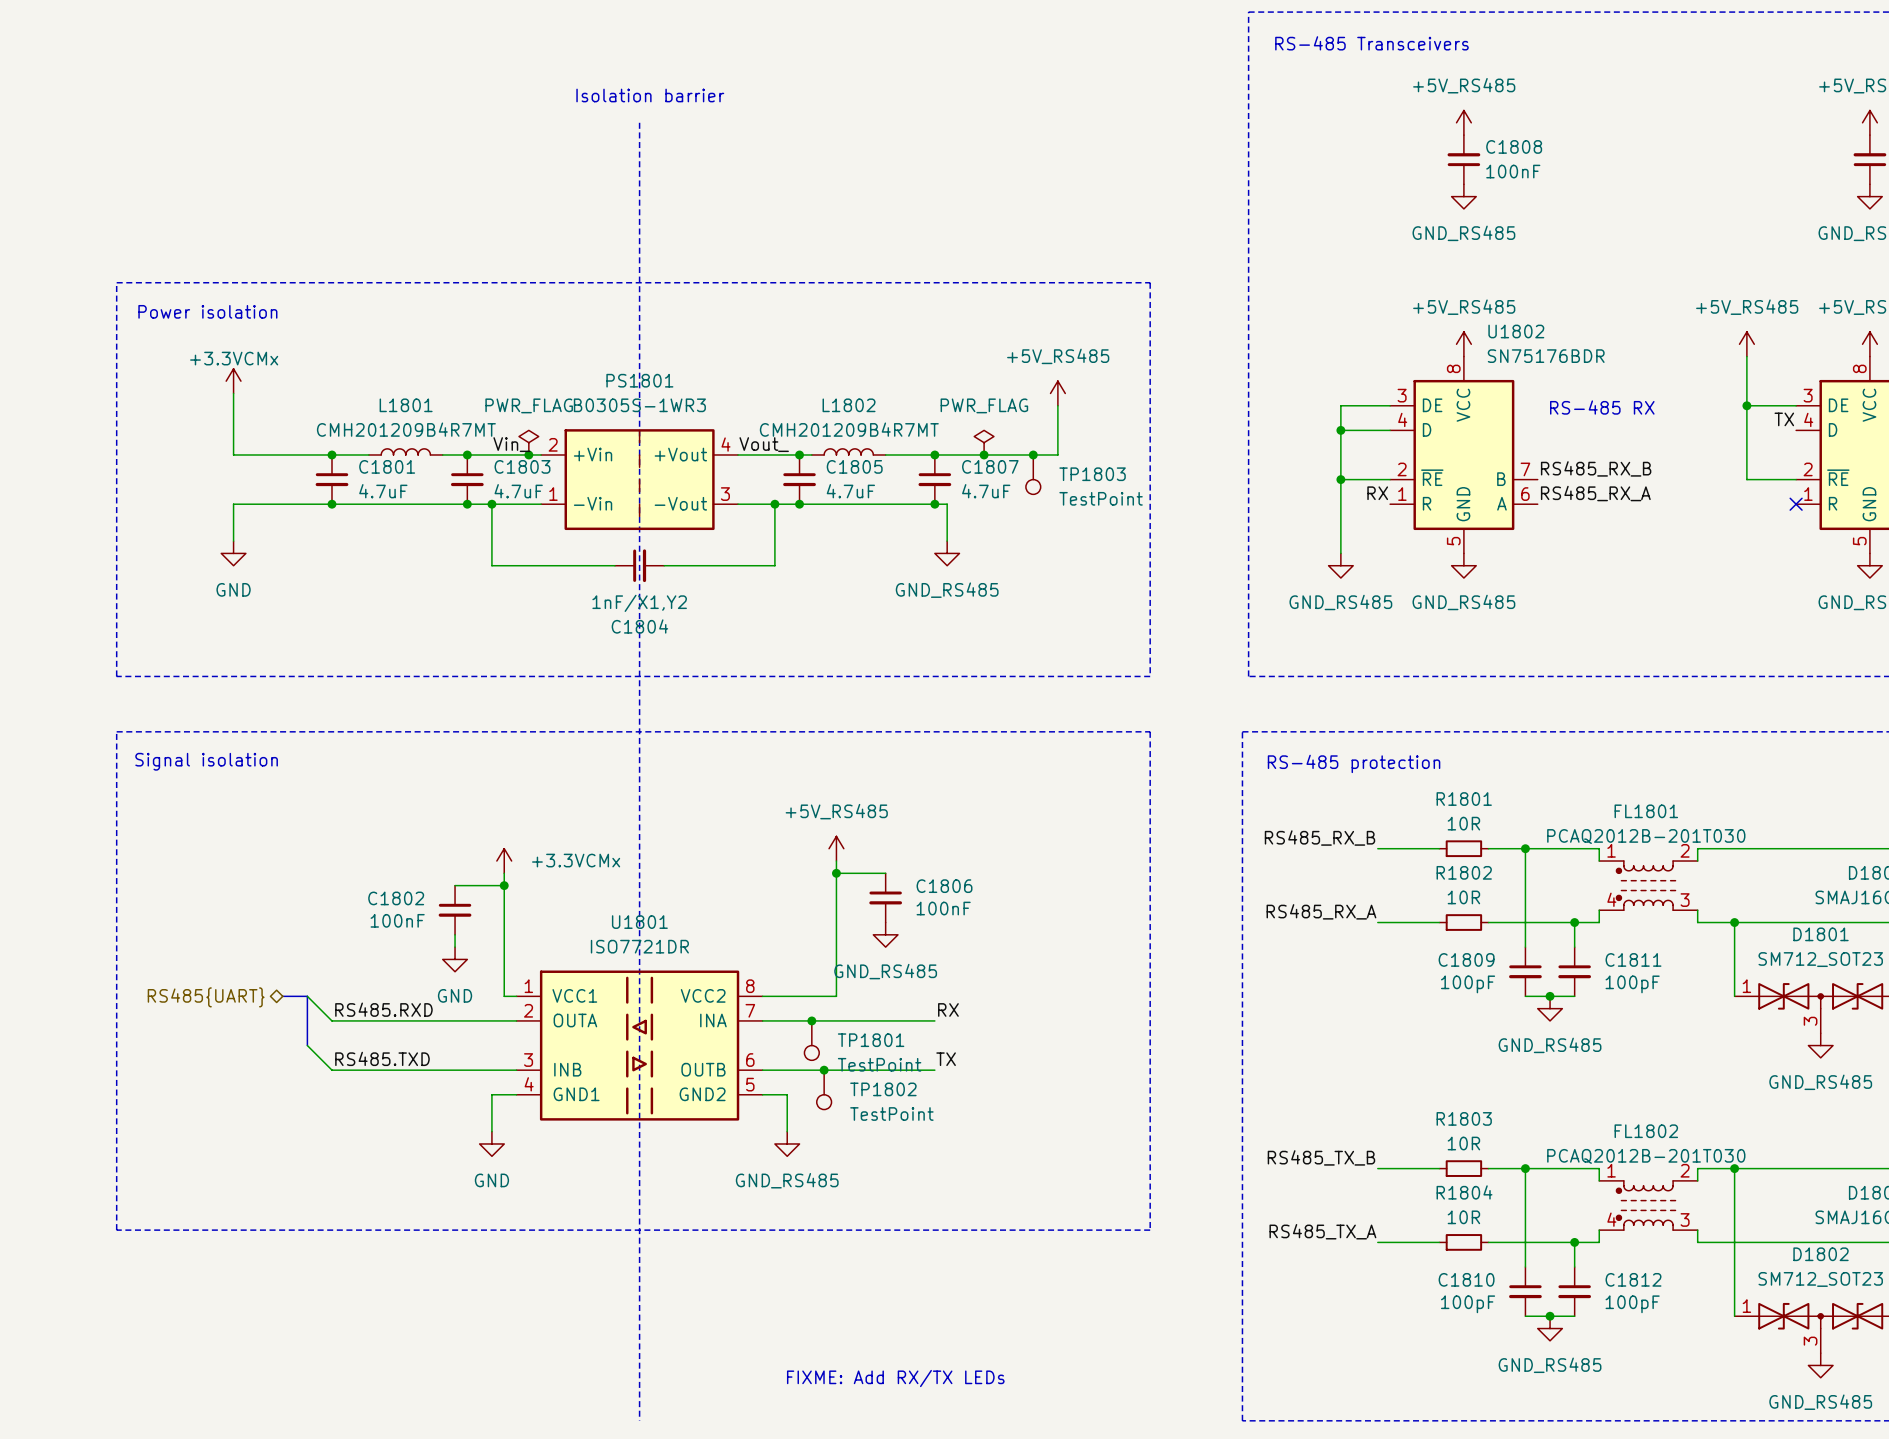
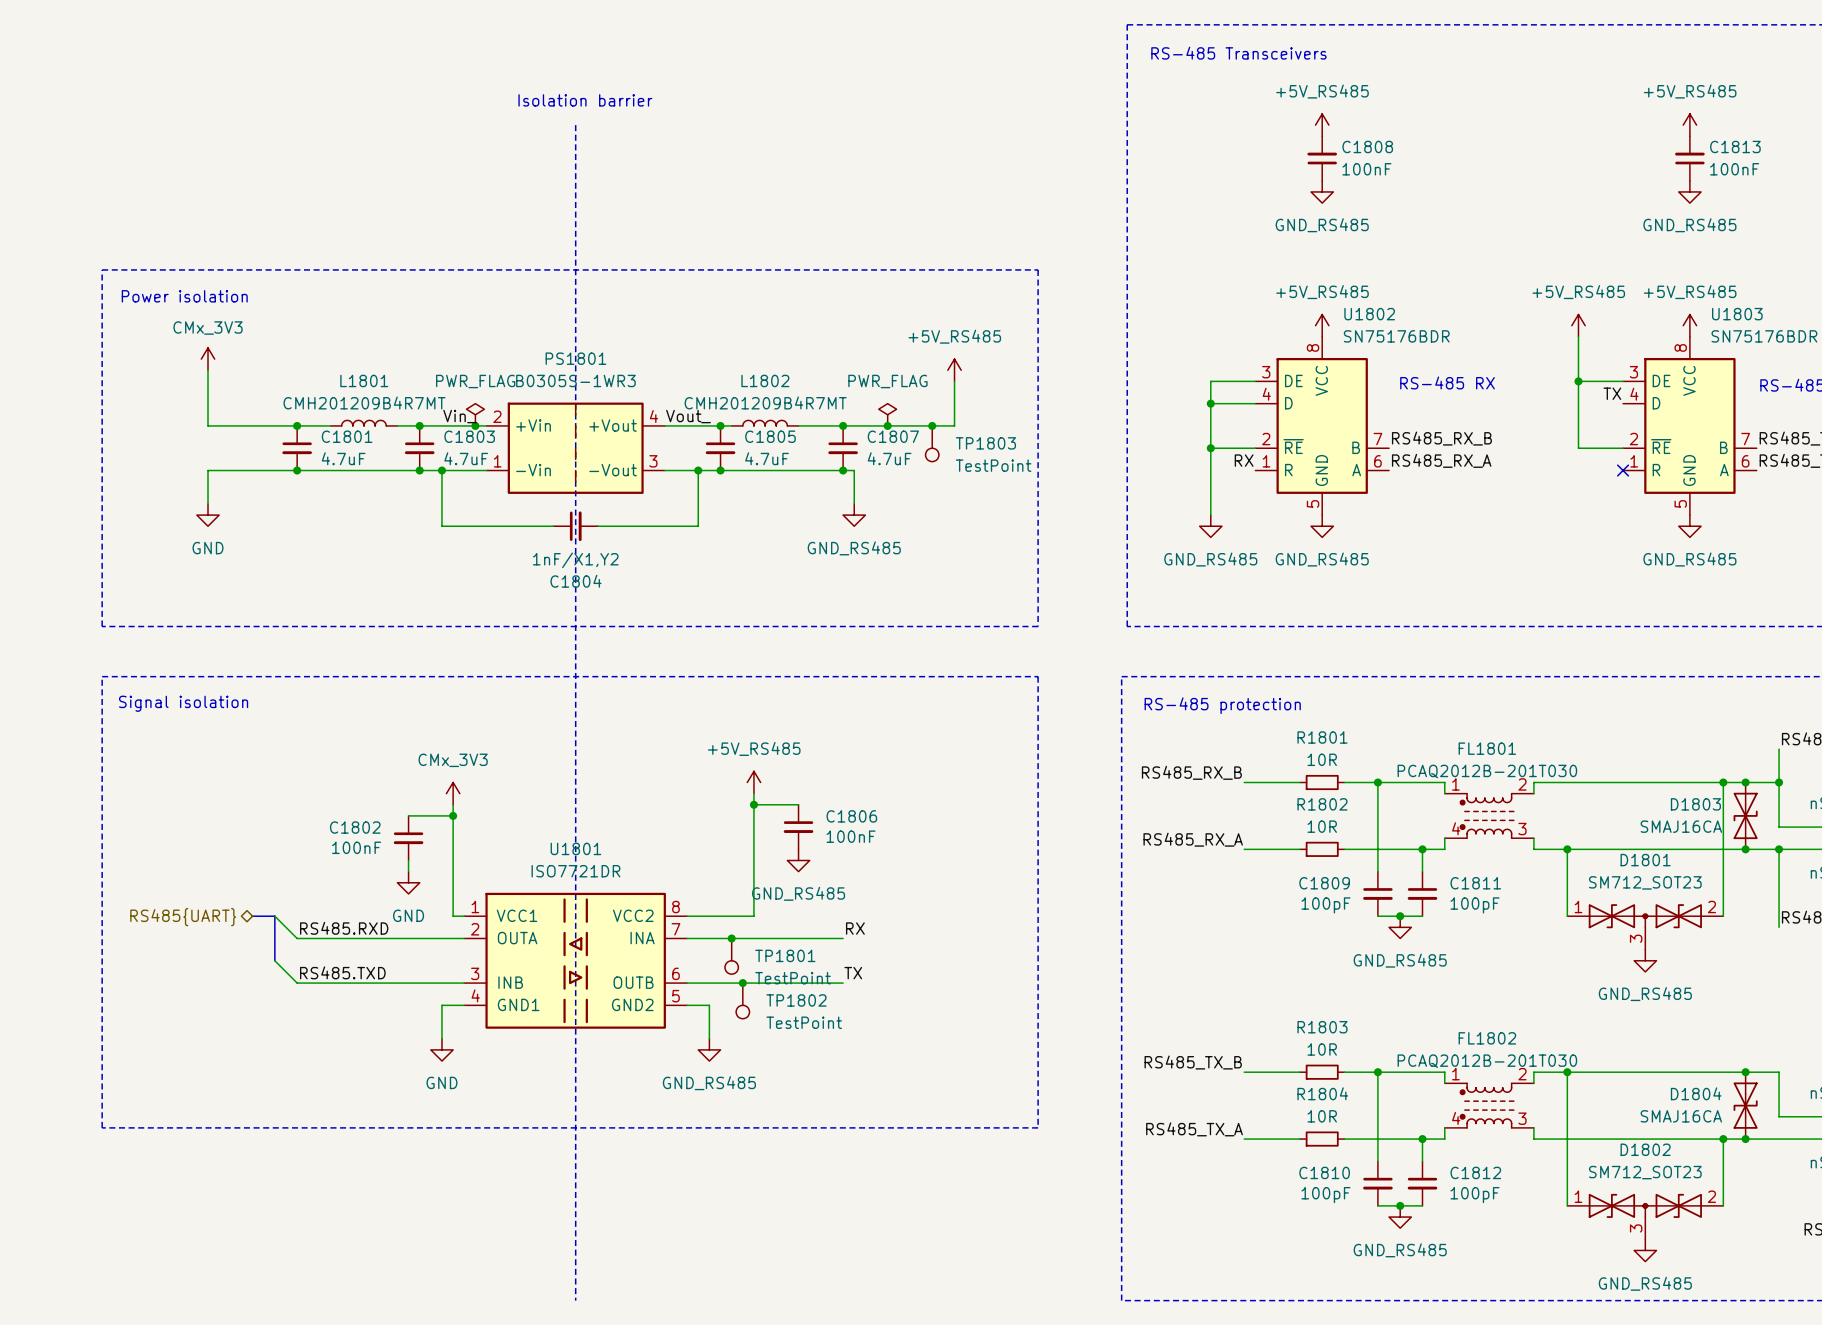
power symbol: +3.3VCMx (233, 381) -> CMx_3V3 (208, 359)
power symbol: +3.3VCMx (504, 861) -> CMx_3V3 (453, 793)
text: FIXME: Add RX/TX LEDs (895, 1378) -> none

